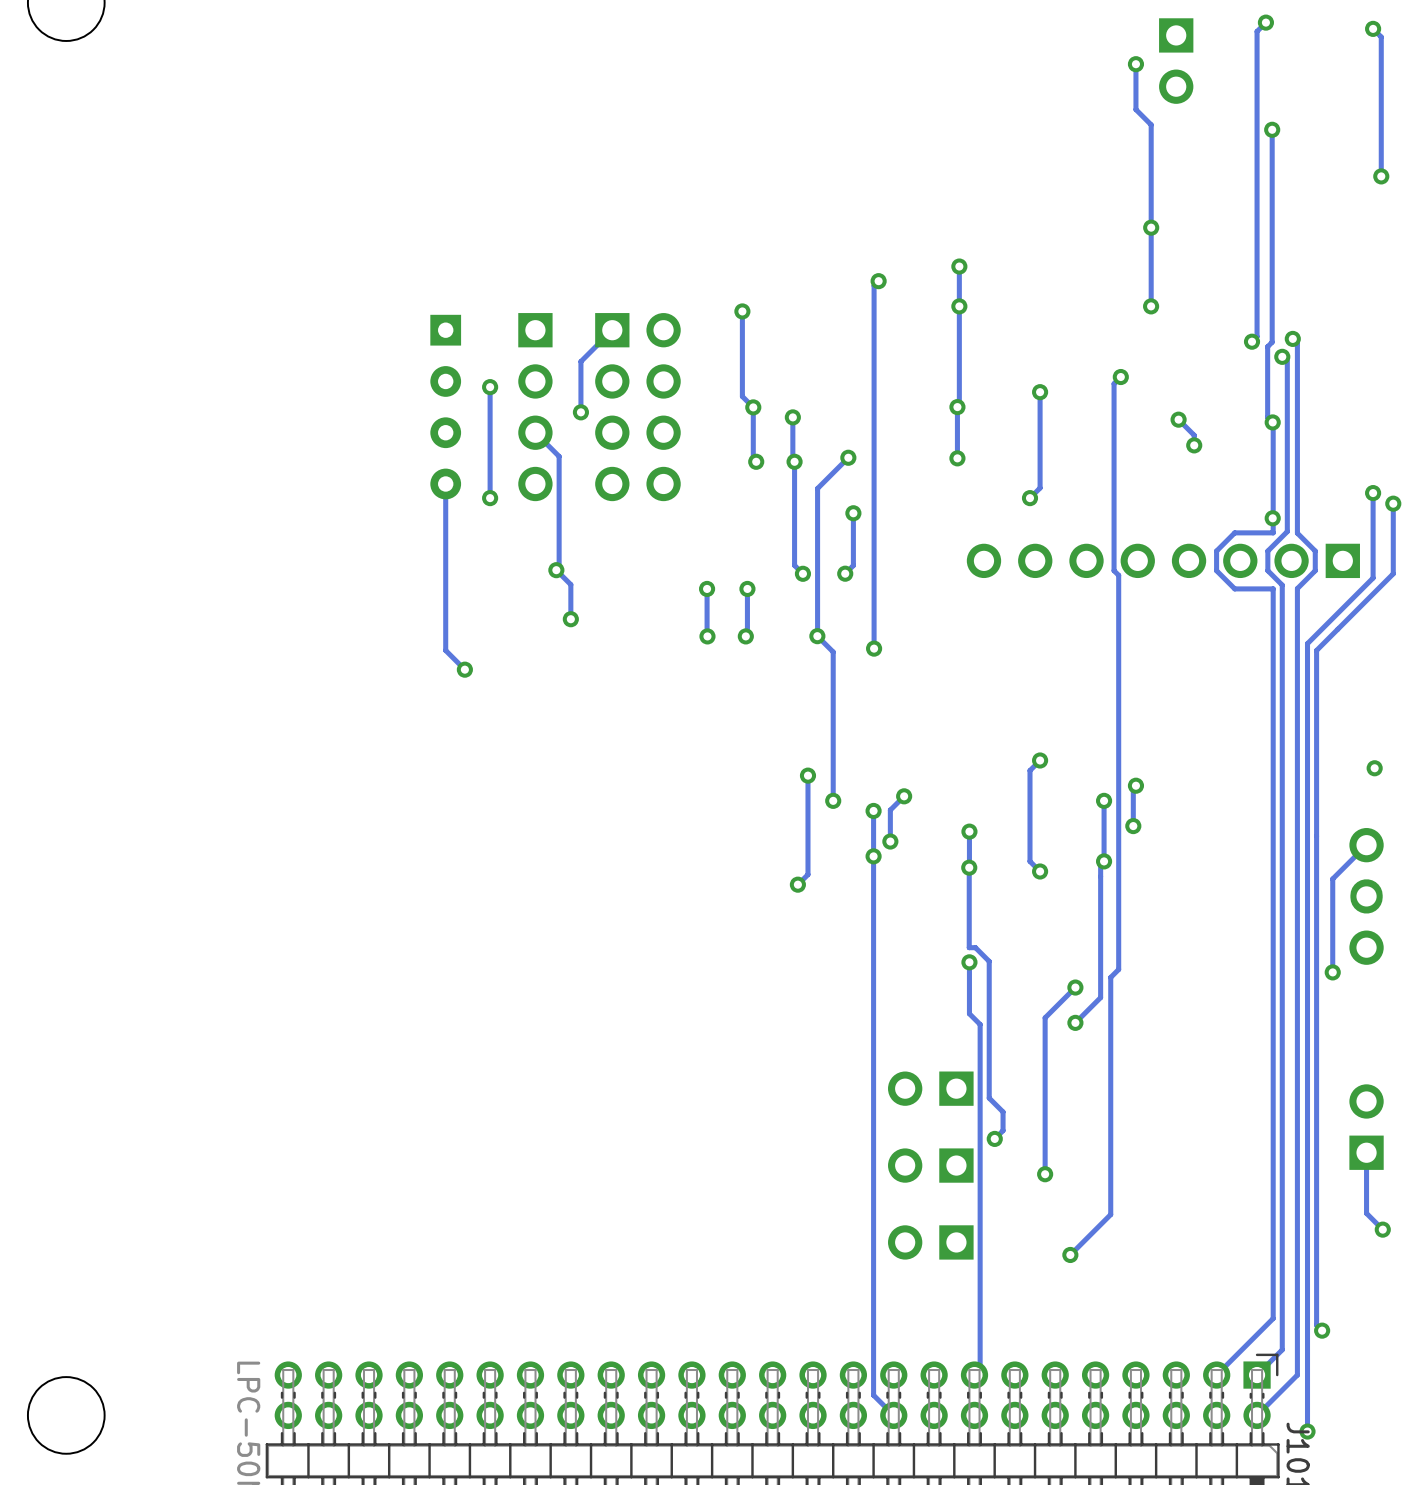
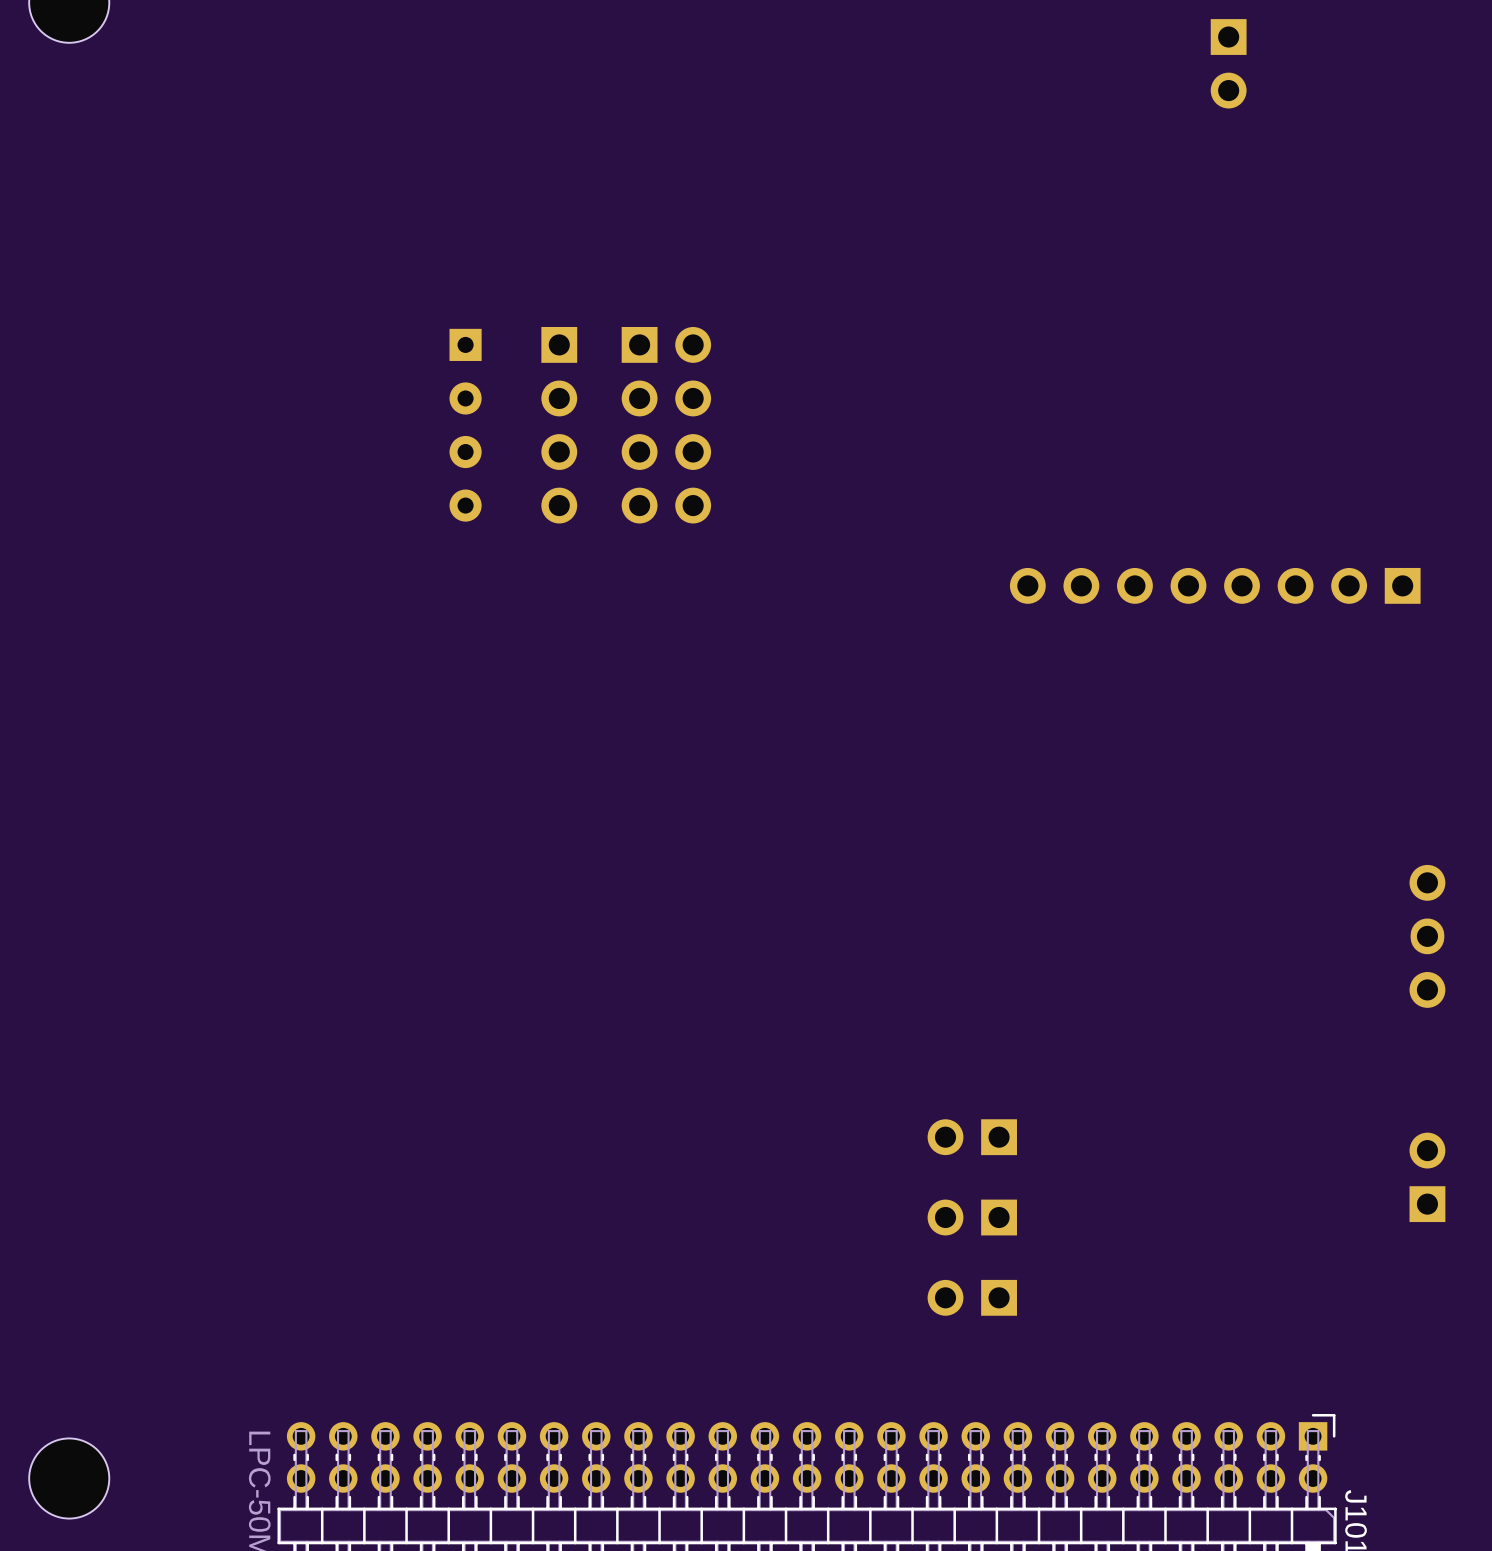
track: (1265, 22) (1257, 31) (1257, 336) (1252, 341) -> none
via: (1265, 22) -> none
track: (1373, 28) (1381, 37) (1381, 176) -> none
via: (1373, 28) -> none
track: (1135, 64) (1135, 109) (1151, 124) (1151, 306) -> none
via: (1135, 64) -> none
track: (1272, 129) (1272, 342) (1267, 346) (1267, 417) (1273, 422) (1273, 532) (1234, 532) (1216, 551) (1216, 570) (1234, 588) (1273, 588) (1273, 1318) (1216, 1375) -> none
via: (1272, 129) -> none
via: (1381, 176) -> none
via: (1151, 227) -> none
track: (959, 266) (957, 458) -> none
via: (959, 266) -> none
track: (878, 281) (874, 285) (874, 648) -> none
via: (878, 281) -> none
via: (959, 306) -> none
via: (1151, 306) -> none
track: (742, 311) (742, 396) (753, 407) (753, 458) (756, 461) -> none
via: (742, 311) -> none
track: (612, 330) (580, 361) (580, 412) -> none
track: (1292, 338) (1297, 343) (1297, 533) (1315, 551) (1315, 570) (1297, 588) (1297, 1375) (1257, 1415) -> none
via: (1292, 338) -> none
via: (1252, 341) -> none
track: (1282, 356) (1287, 356) (1287, 531) (1267, 551) (1267, 570) (1282, 585) (1282, 1349) (1257, 1375) -> none
via: (1282, 356) -> none
track: (1120, 377) (1114, 383) (1114, 570) (1118, 575) (1118, 969) (1110, 977) (1110, 1214) (1070, 1254) -> none
via: (1120, 377) -> none
track: (490, 387) (490, 498) -> none
via: (490, 387) -> none
track: (1040, 392) (1040, 488) (1029, 498) -> none
via: (1040, 392) -> none
via: (753, 407) -> none
via: (957, 407) -> none
via: (580, 412) -> none
track: (792, 417) (794, 565) (802, 573) -> none
via: (792, 417) -> none
track: (1178, 419) (1194, 435) (1194, 445) -> none
via: (1178, 419) -> none
via: (1272, 422) -> none
track: (535, 432) (559, 456) (559, 567) (556, 570) (570, 584) (570, 619) -> none
via: (1194, 445) -> none
track: (848, 457) (817, 488) (817, 635) -> none
via: (848, 457) -> none
via: (957, 458) -> none
via: (756, 461) -> none
via: (794, 461) -> none
track: (445, 483) (445, 650) (464, 669) -> none
track: (1373, 493) (1373, 578) (1307, 643) (1307, 1431) -> none
via: (1373, 493) -> none
via: (490, 498) -> none
via: (1029, 498) -> none
track: (1393, 503) (1393, 573) (1316, 650) (1316, 1325) (1322, 1330) -> none
via: (1393, 503) -> none
track: (853, 513) (853, 565) (845, 573) -> none
via: (853, 513) -> none
via: (1272, 518) -> none
via: (556, 570) -> none
via: (802, 573) -> none
via: (845, 573) -> none
track: (707, 588) (707, 636) -> none
via: (707, 588) -> none
track: (747, 588) (747, 634) (745, 636) -> none
via: (747, 588) -> none
via: (570, 619) -> none
via: (707, 636) -> none
via: (745, 636) -> none
track: (817, 636) (833, 652) (833, 800) -> none
via: (817, 636) -> none
via: (874, 648) -> none
via: (464, 669) -> none
track: (1040, 760) (1029, 770) (1029, 861) (1040, 871) -> none
via: (1040, 760) -> none
via: (1374, 768) -> none
track: (807, 775) (807, 874) (797, 884) -> none
via: (807, 775) -> none
track: (1135, 785) (1133, 788) (1133, 826) -> none
via: (1135, 785) -> none
track: (904, 796) (890, 810) (890, 841) -> none
via: (904, 796) -> none
via: (833, 800) -> none
track: (1104, 800) (1104, 861) (1100, 864) (1100, 997) (1075, 1022) -> none
via: (1104, 800) -> none
track: (873, 810) (873, 1395) (893, 1415) -> none
via: (873, 810) -> none
via: (1133, 826) -> none
track: (969, 831) (969, 867) -> none
via: (969, 831) -> none
via: (890, 841) -> none
track: (1366, 845) (1332, 878) (1332, 972) -> none
via: (873, 856) -> none
via: (1104, 861) -> none
track: (969, 867) (969, 947) (975, 947) (989, 961) (989, 1098) (1003, 1111) (1003, 1130) (994, 1138) -> none
via: (969, 867) -> none
via: (1040, 871) -> none
via: (797, 884) -> none
track: (969, 962) (969, 1013) (980, 1024) (980, 1369) (974, 1375) -> none
via: (969, 962) -> none
via: (1332, 972) -> none
track: (1075, 987) (1045, 1017) (1045, 1174) -> none
via: (1075, 987) -> none
via: (1075, 1022) -> none
via: (994, 1138) -> none
track: (1366, 1152) (1366, 1213) (1382, 1229) -> none
via: (1045, 1174) -> none
via: (1382, 1229) -> none
via: (1070, 1254) -> none
via: (1322, 1330) -> none
via: (1307, 1431) -> none

